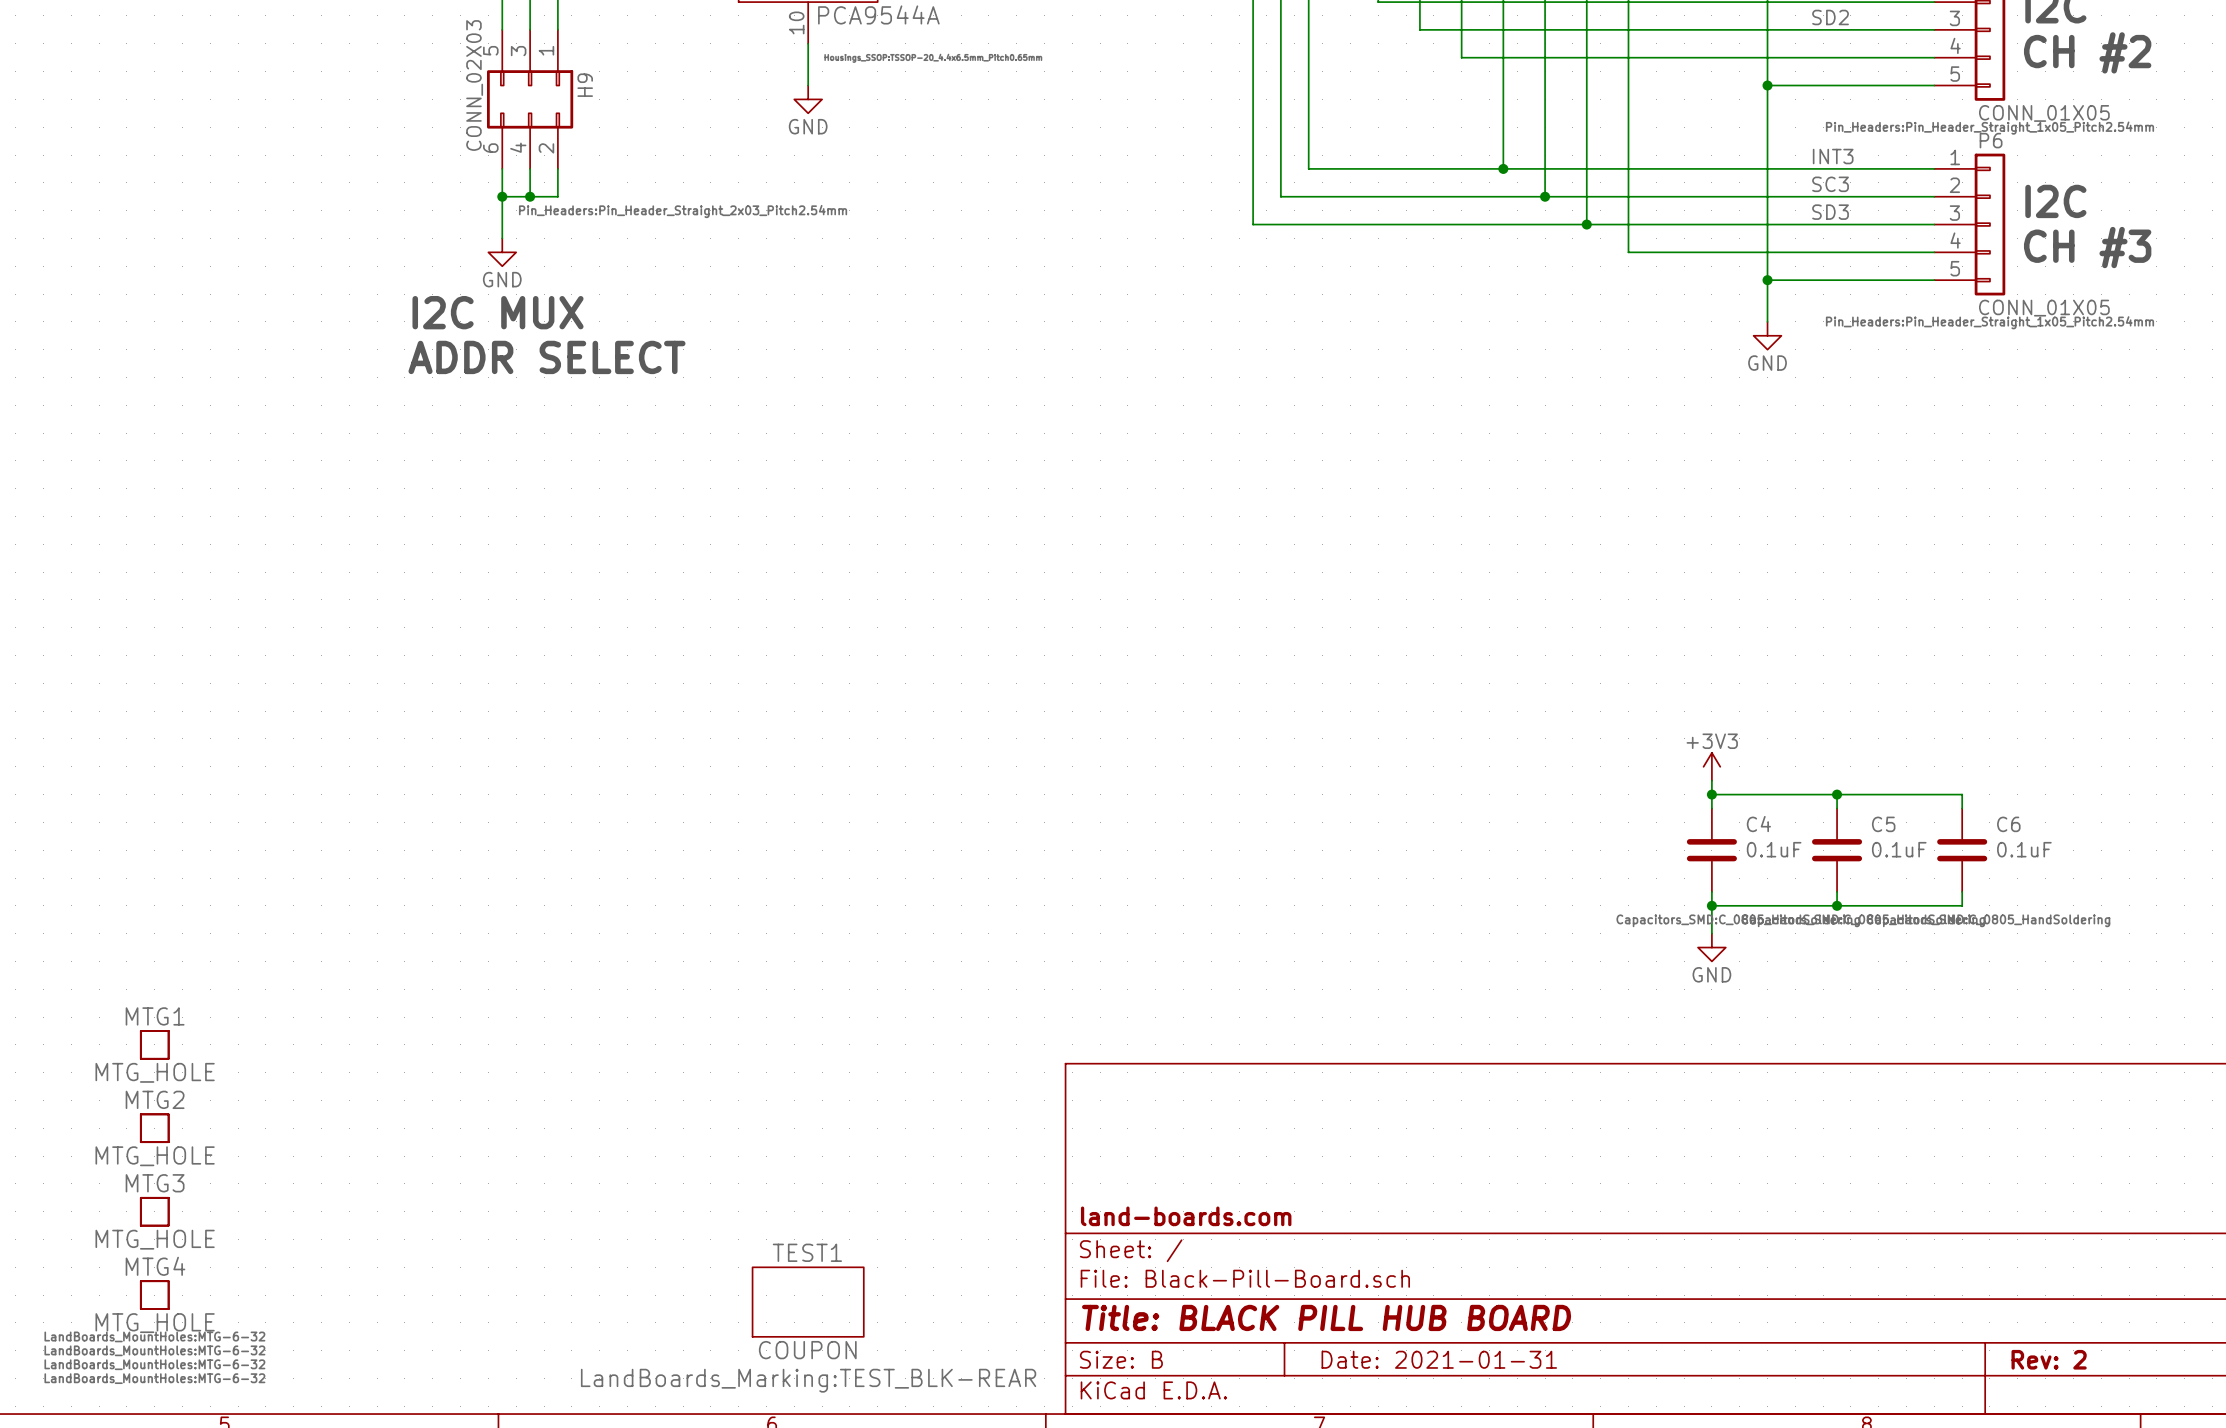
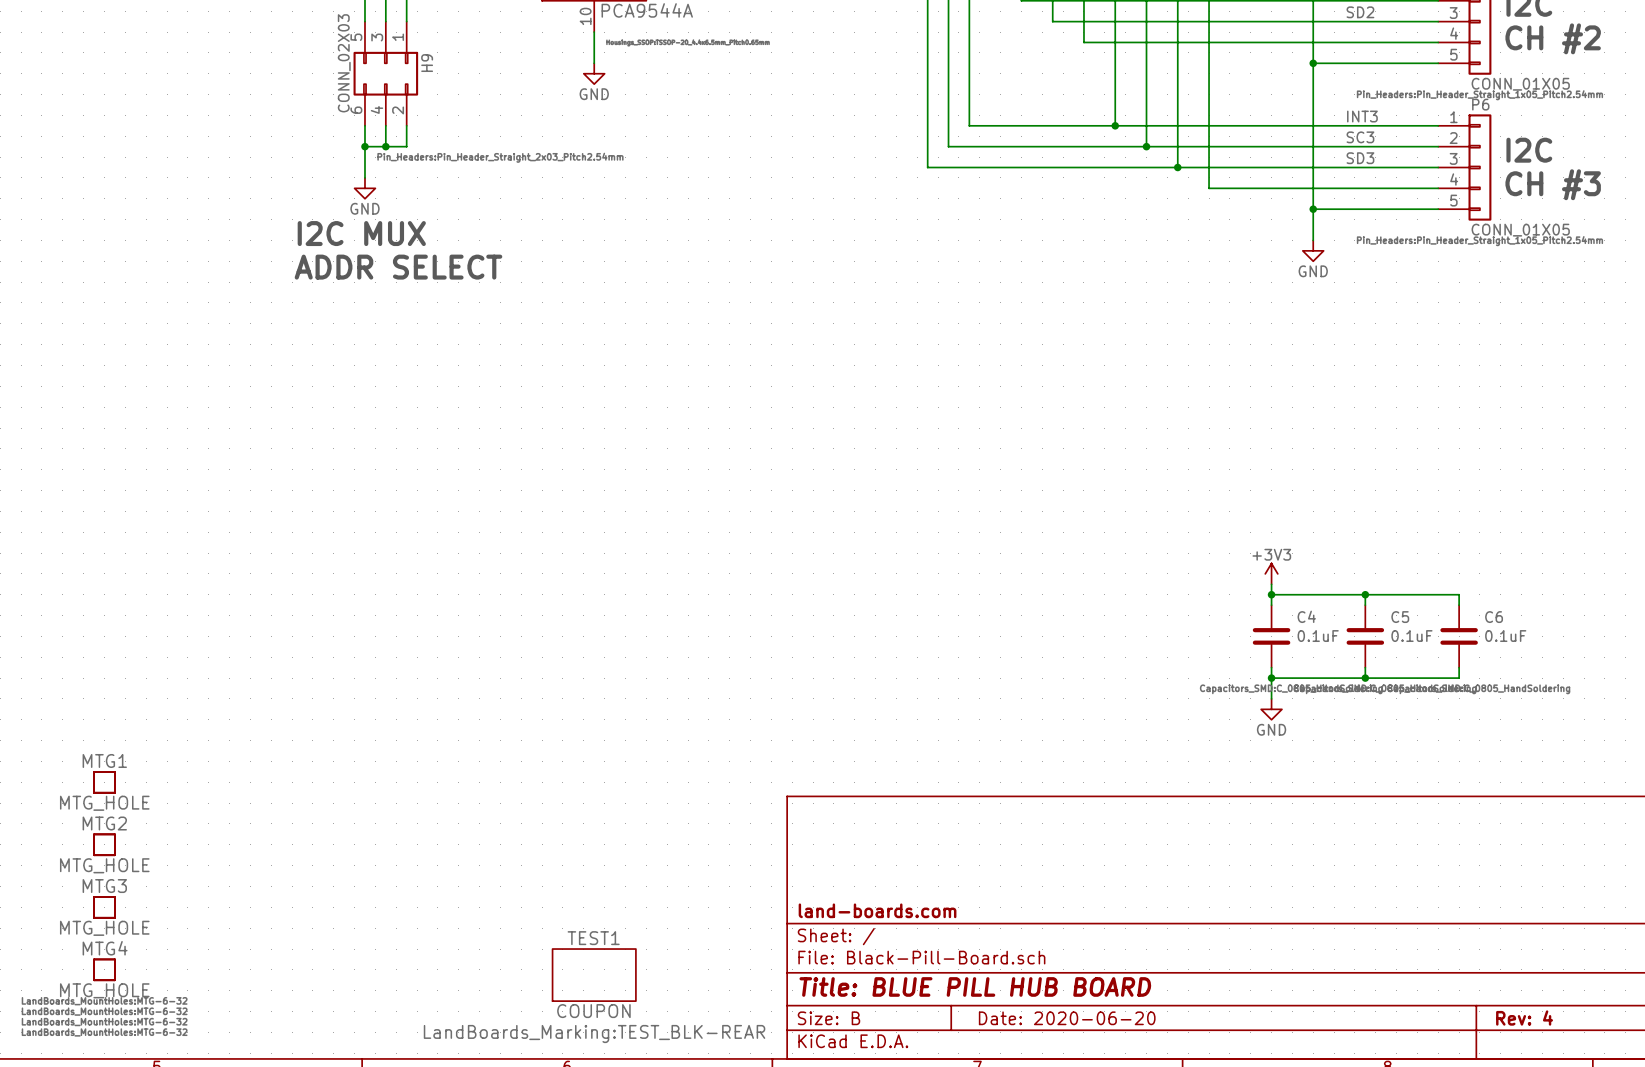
title block: Title: BLACK PILL HUB BOARD (1326, 1317) -> Title: BLUE PILL HUB BOARD (975, 986)
title block: Date: 2021-01-31 (1439, 1359) -> Date: 2020-06-20 (1067, 1018)
title block: Rev: 2 (2049, 1359) -> Rev: 4 (1524, 1018)

